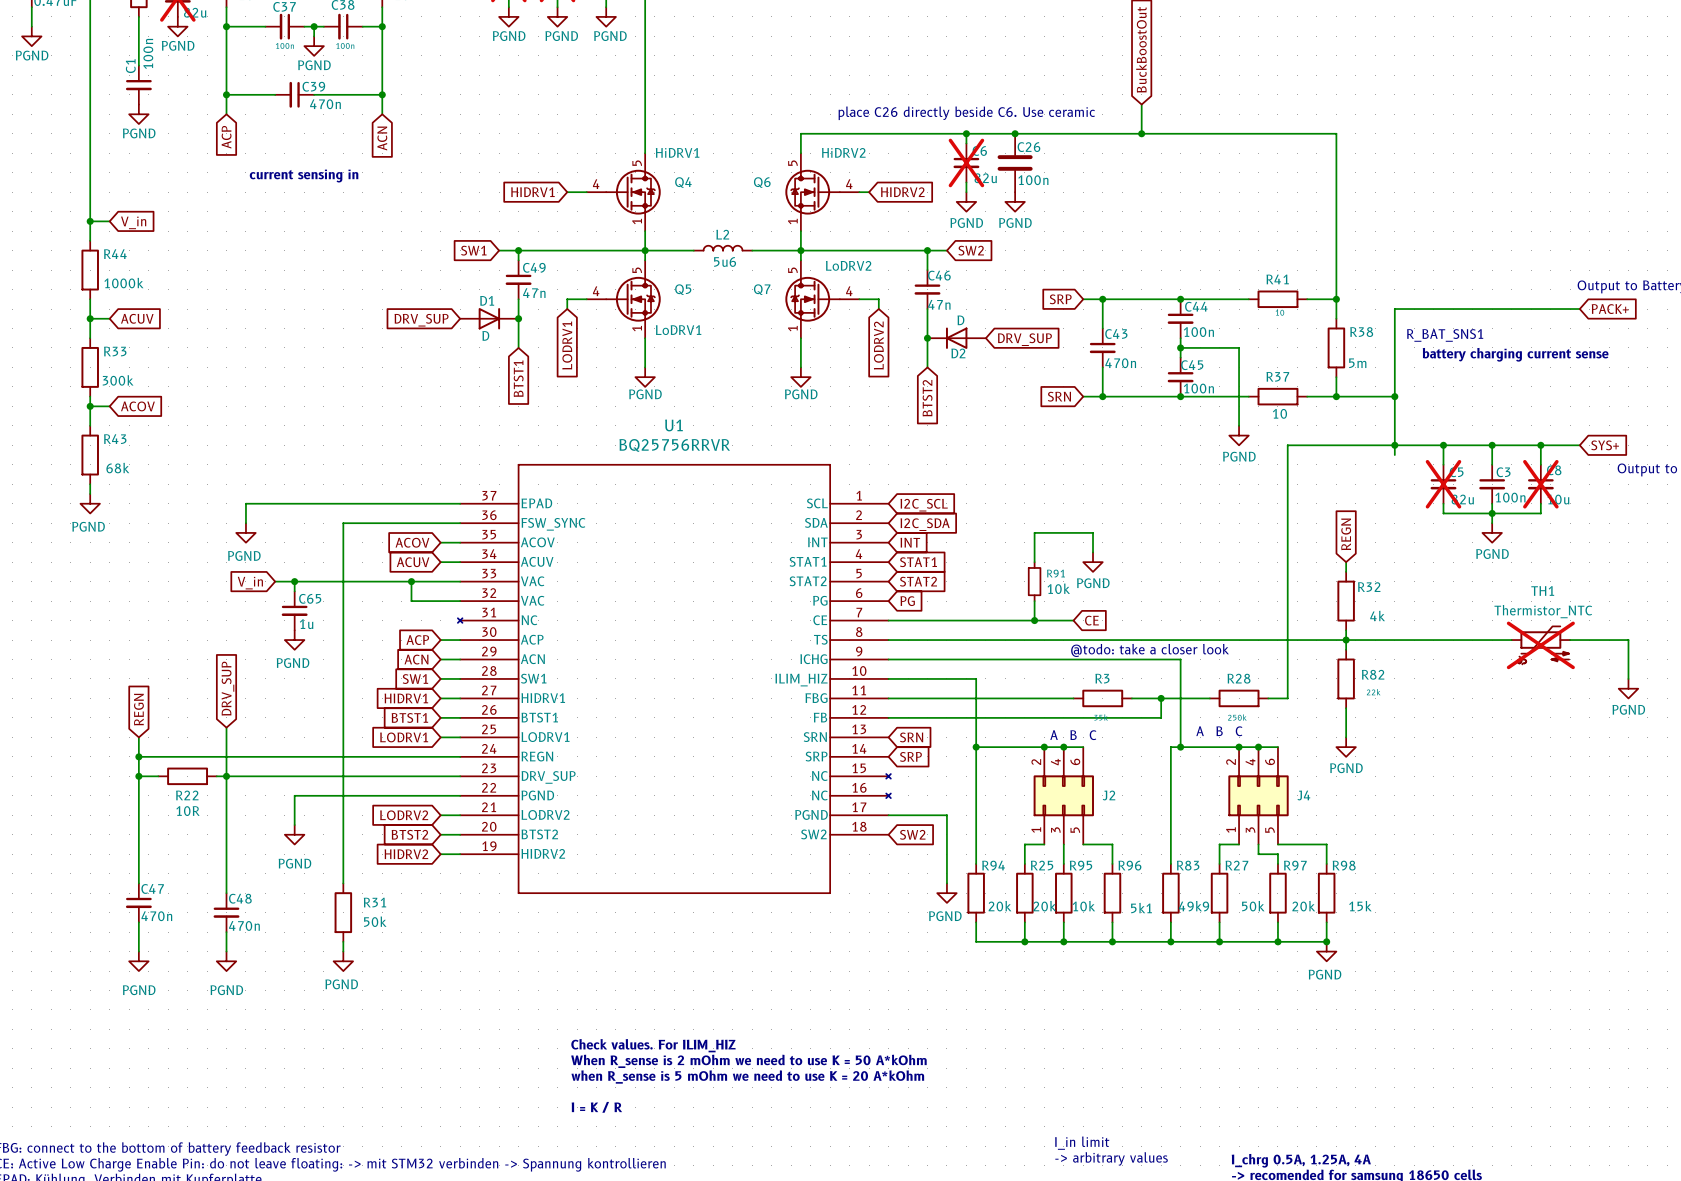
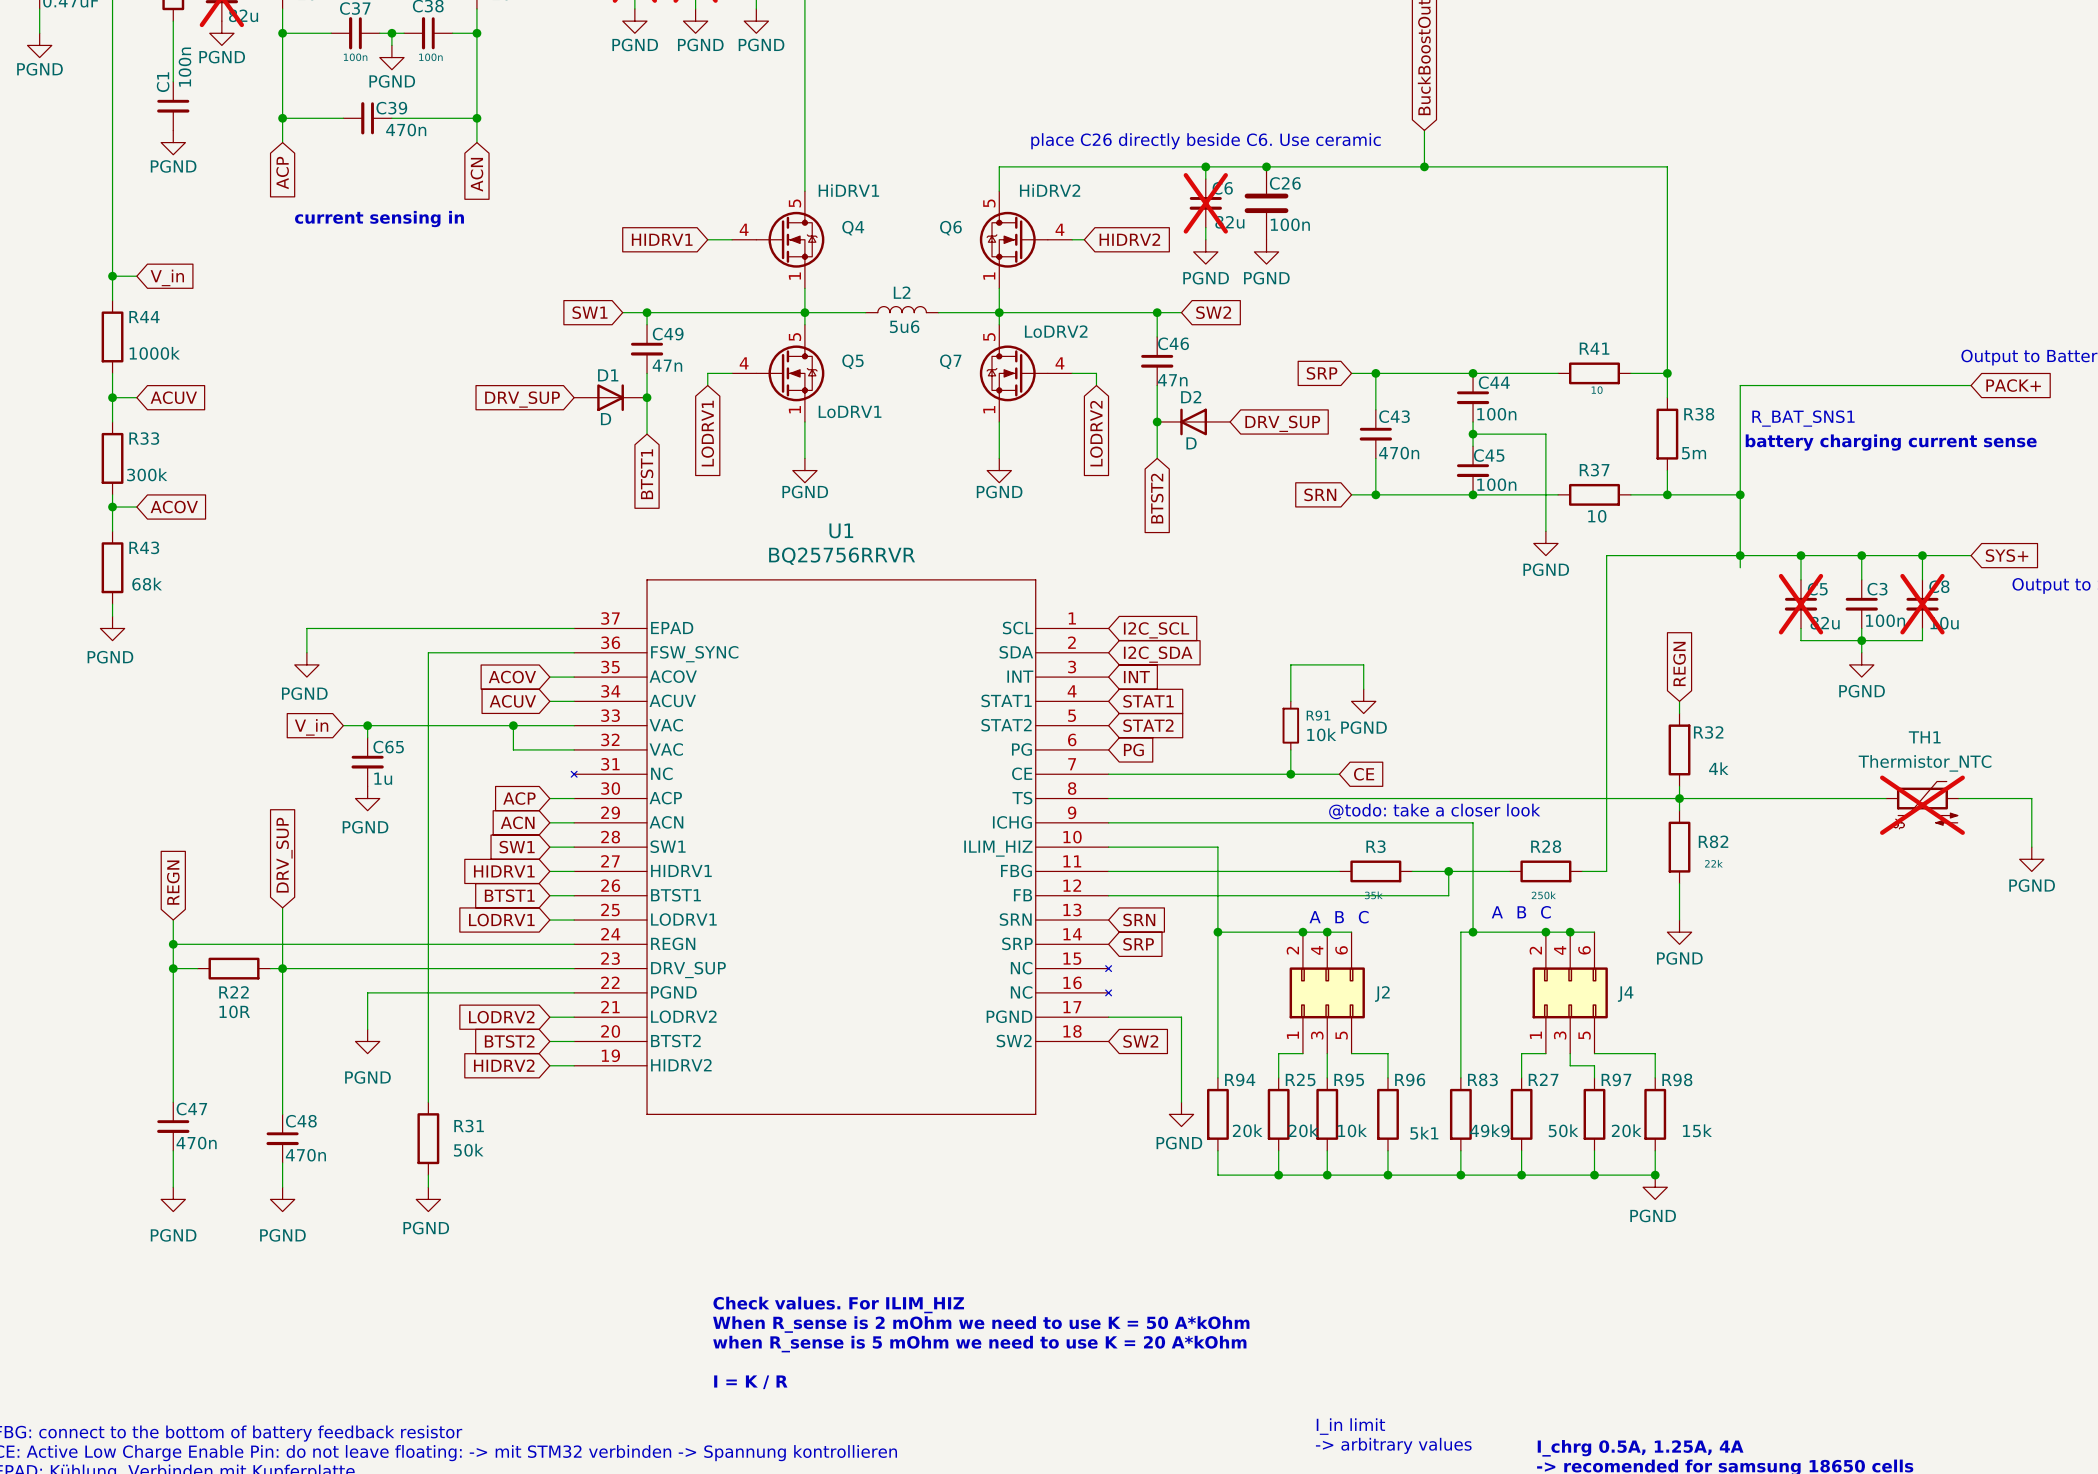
D2 value position: D (960, 320) -> D (1191, 443)
D2 name position: D2 (958, 353) -> D2 (1191, 397)

